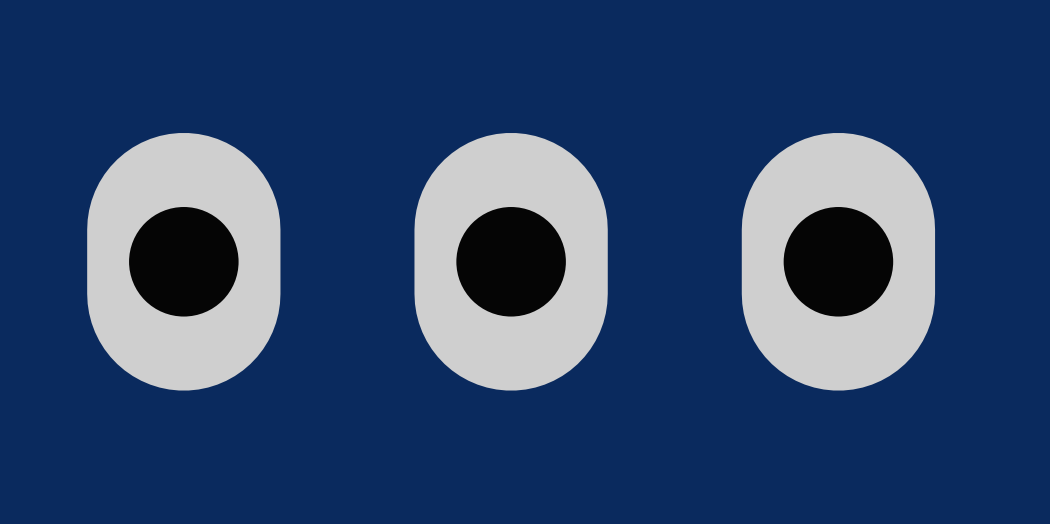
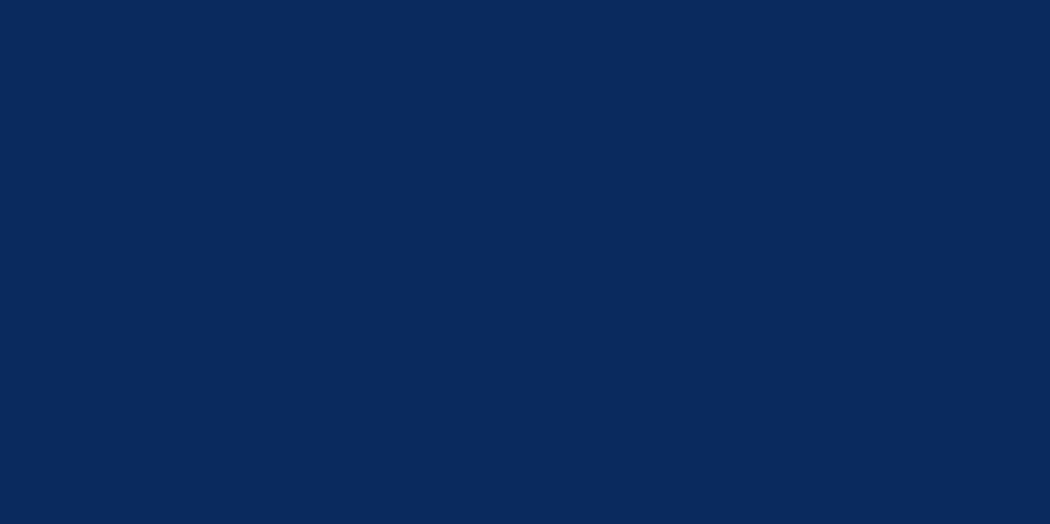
part: (511, 261) -> none

